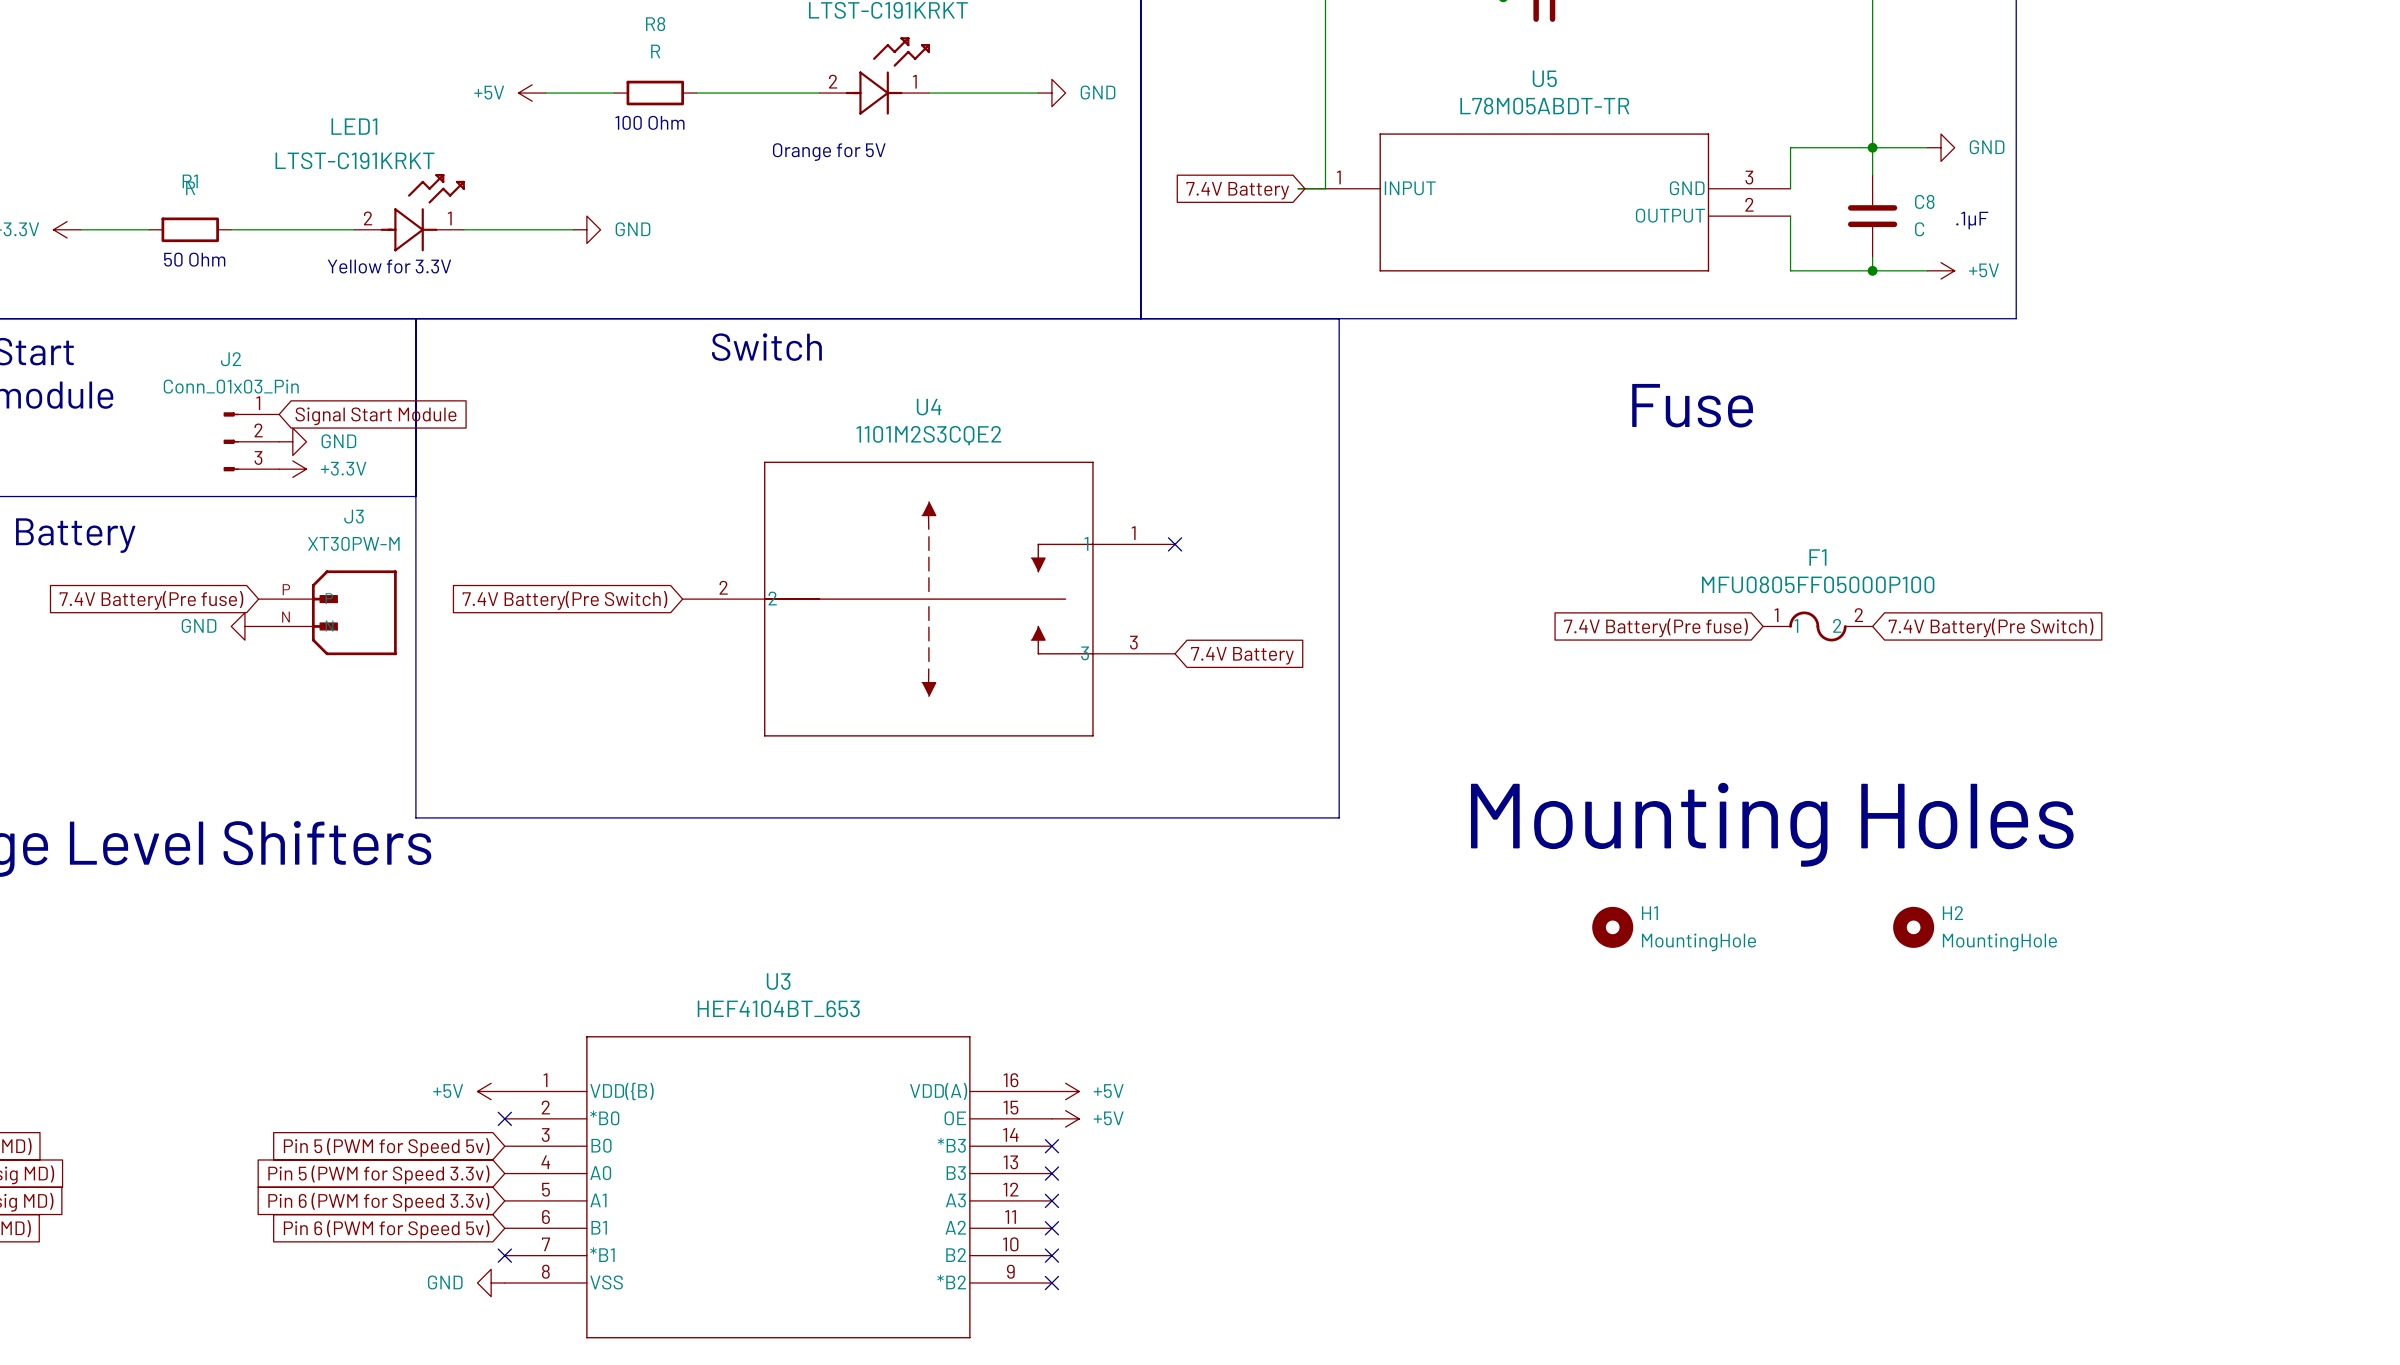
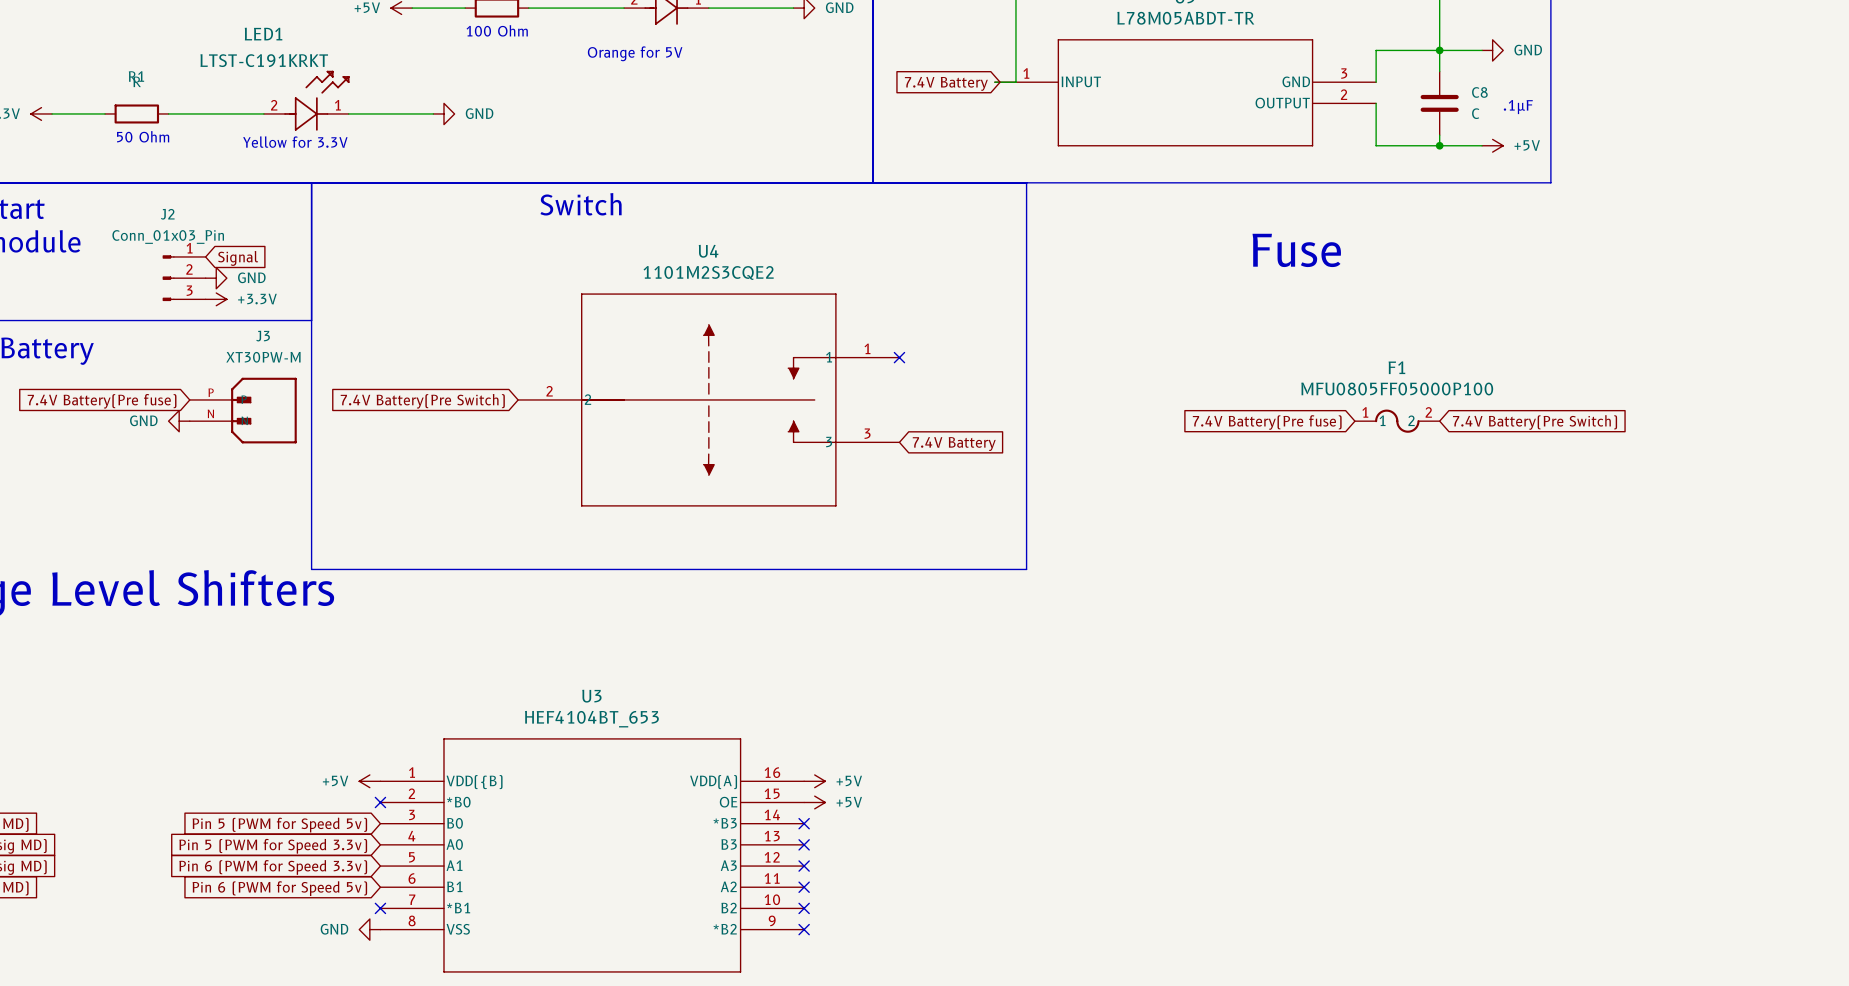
global label: Signal Start Module (375, 416) -> Signal (238, 258)
text: Mounting Holes (1772, 824) -> none
H1: MountingHole (1612, 927) -> none
H2: MountingHole (1913, 927) -> none

